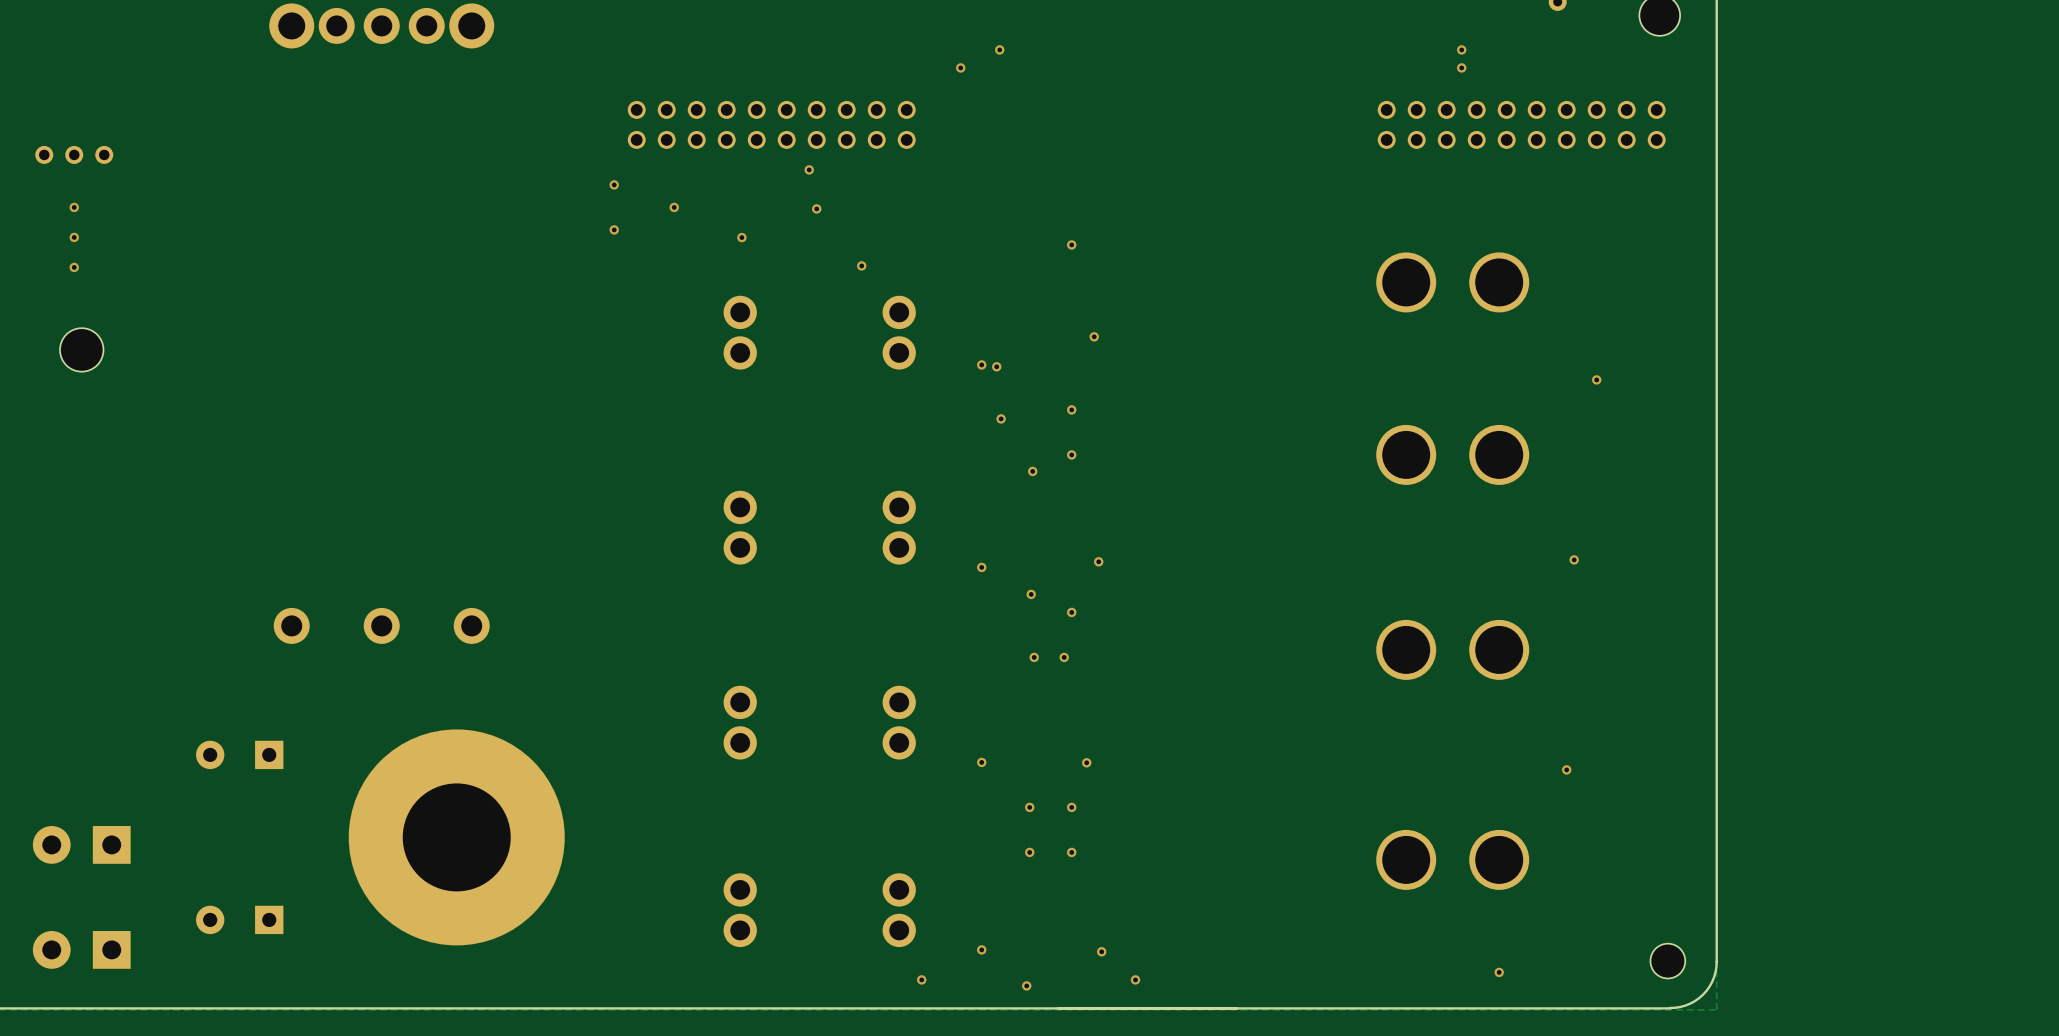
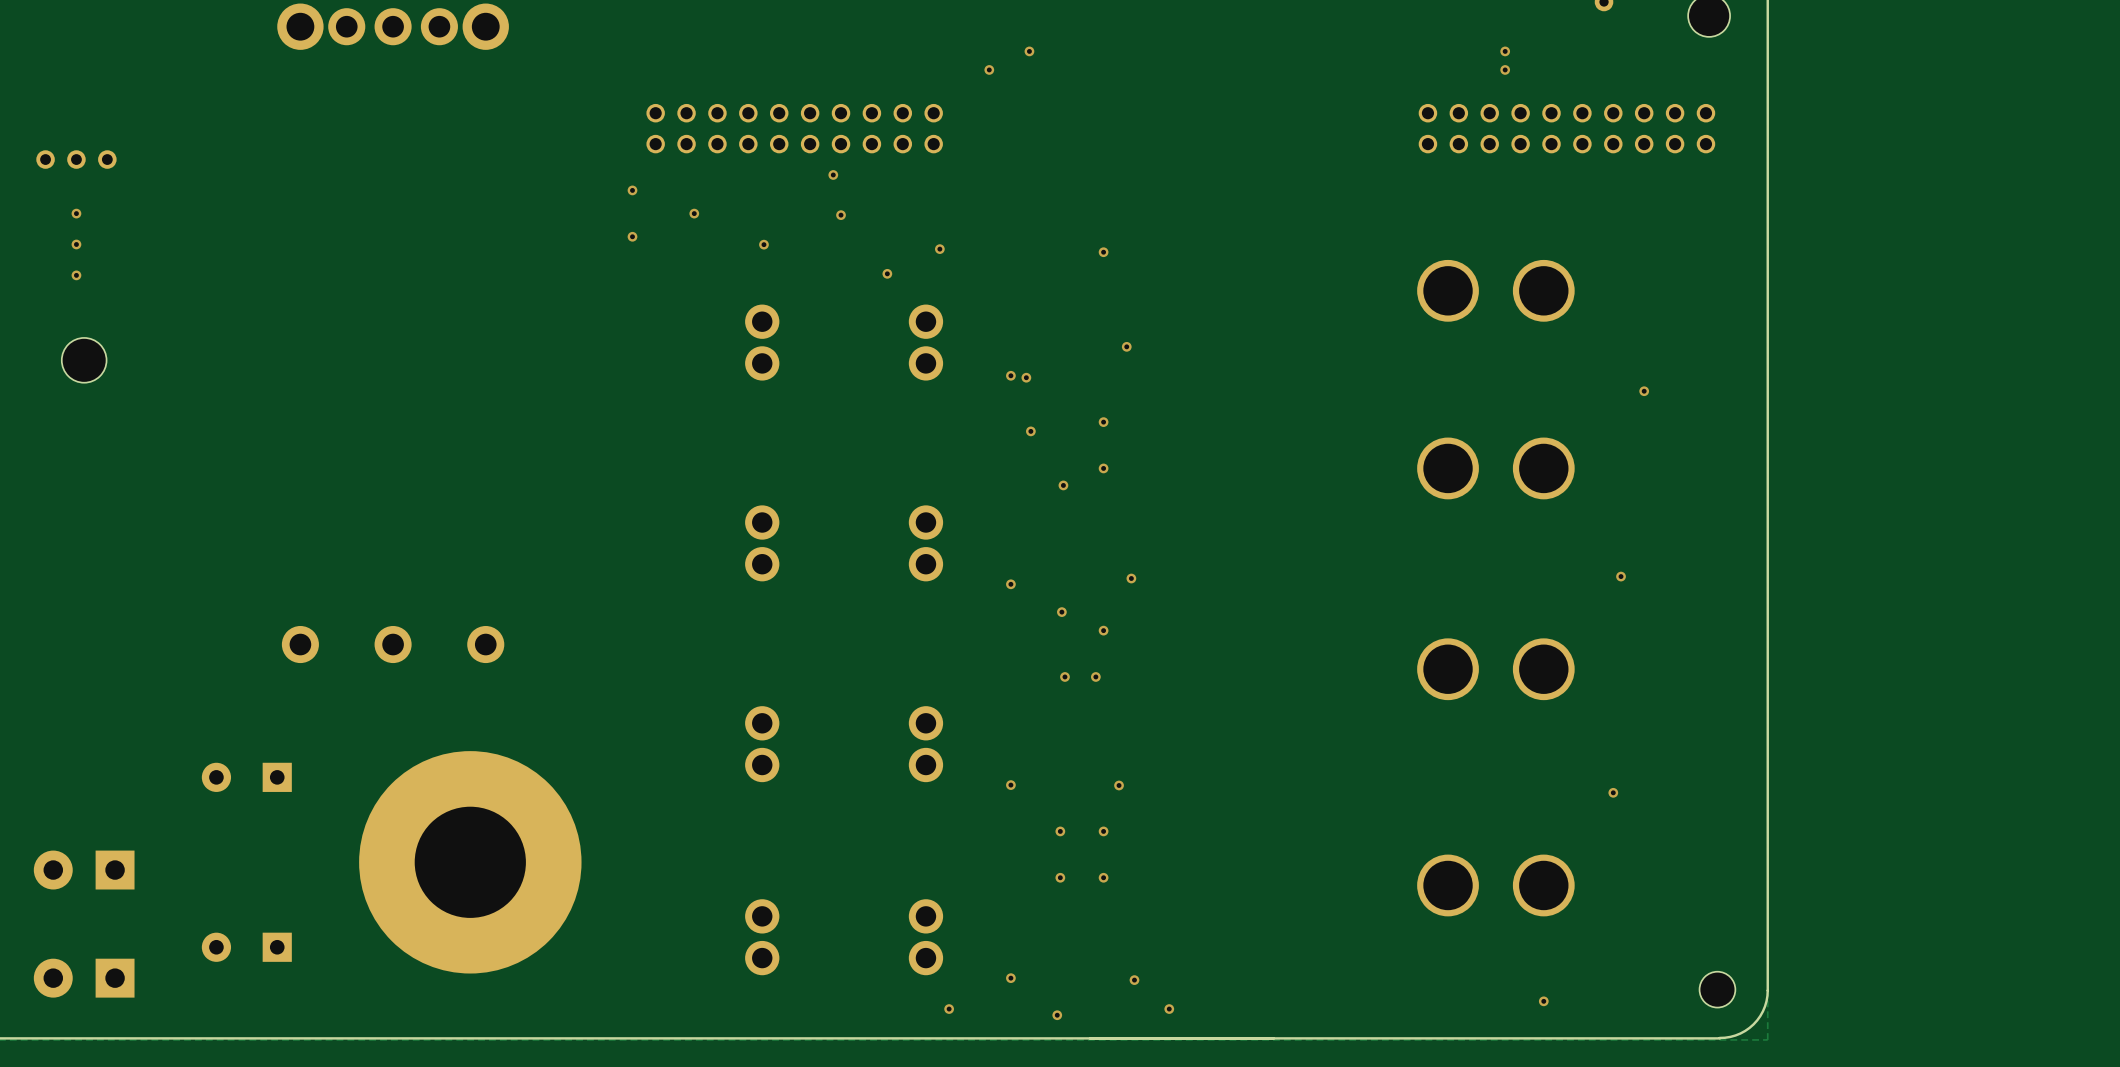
via: none -> (939, 249)

